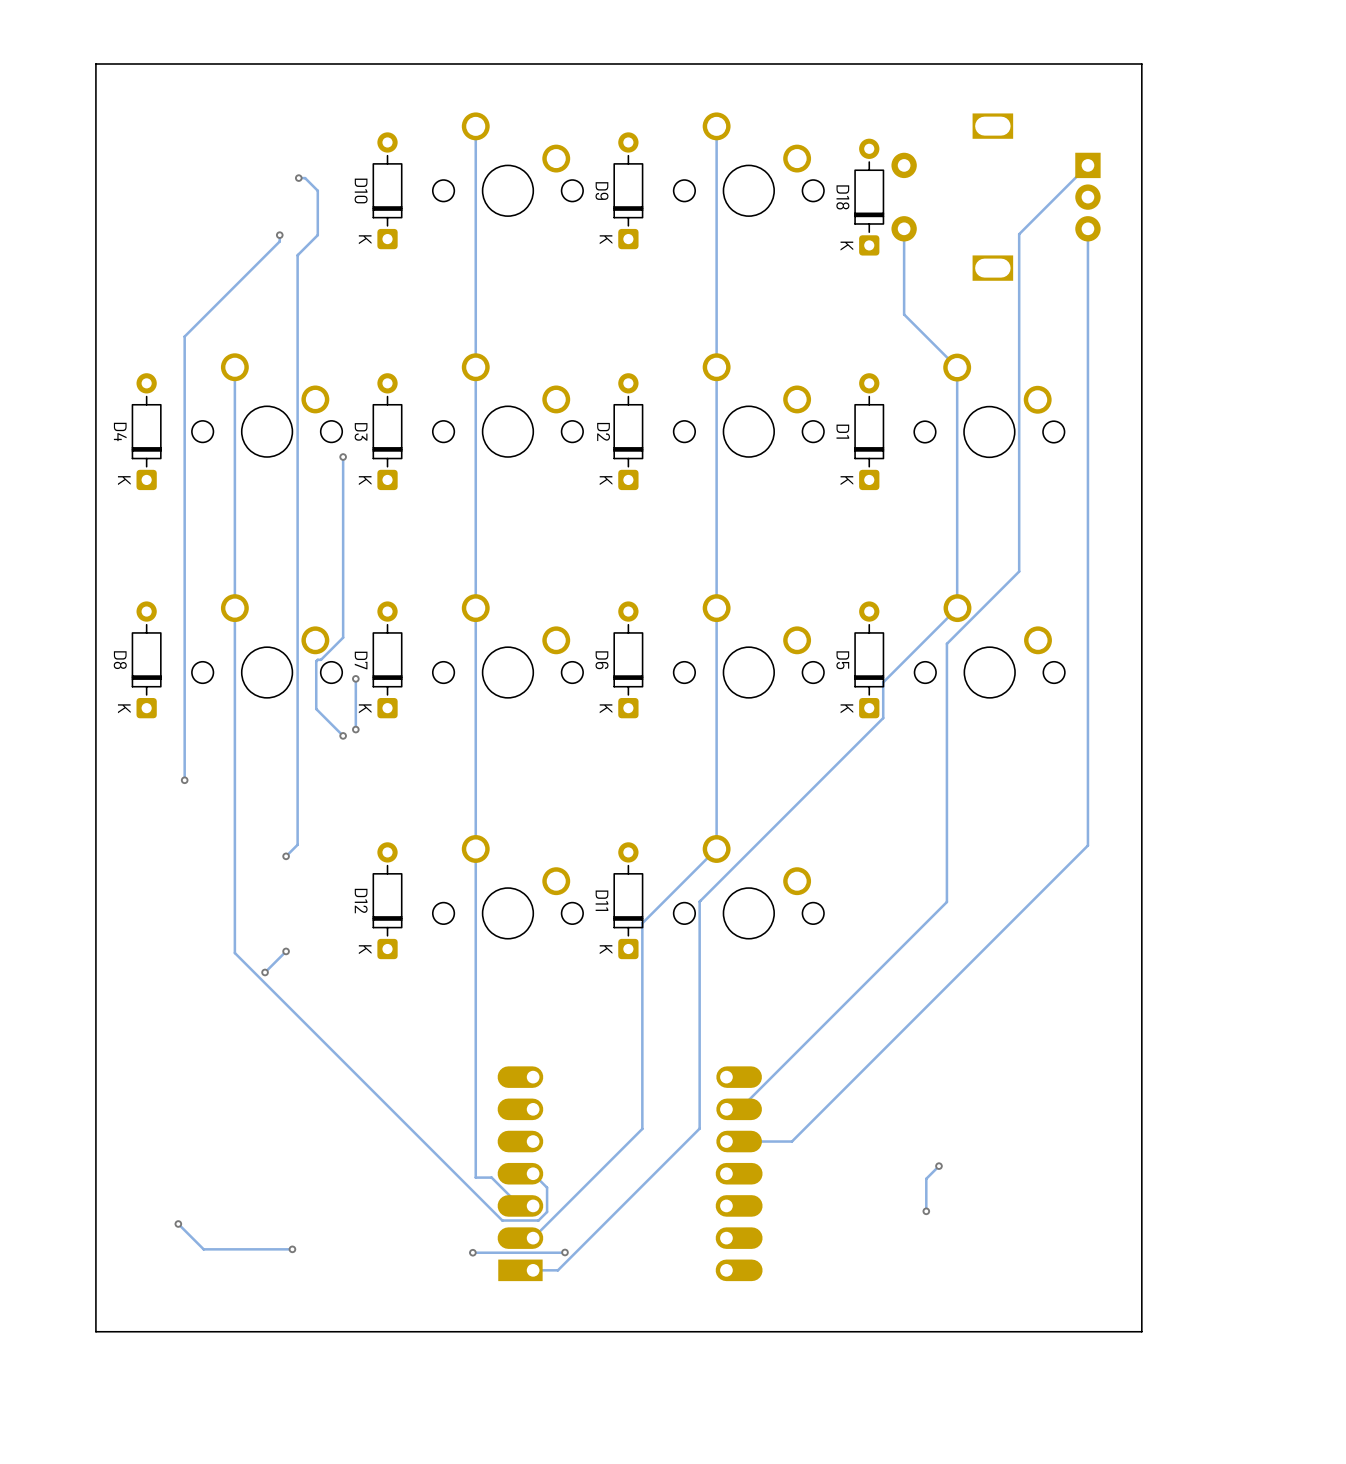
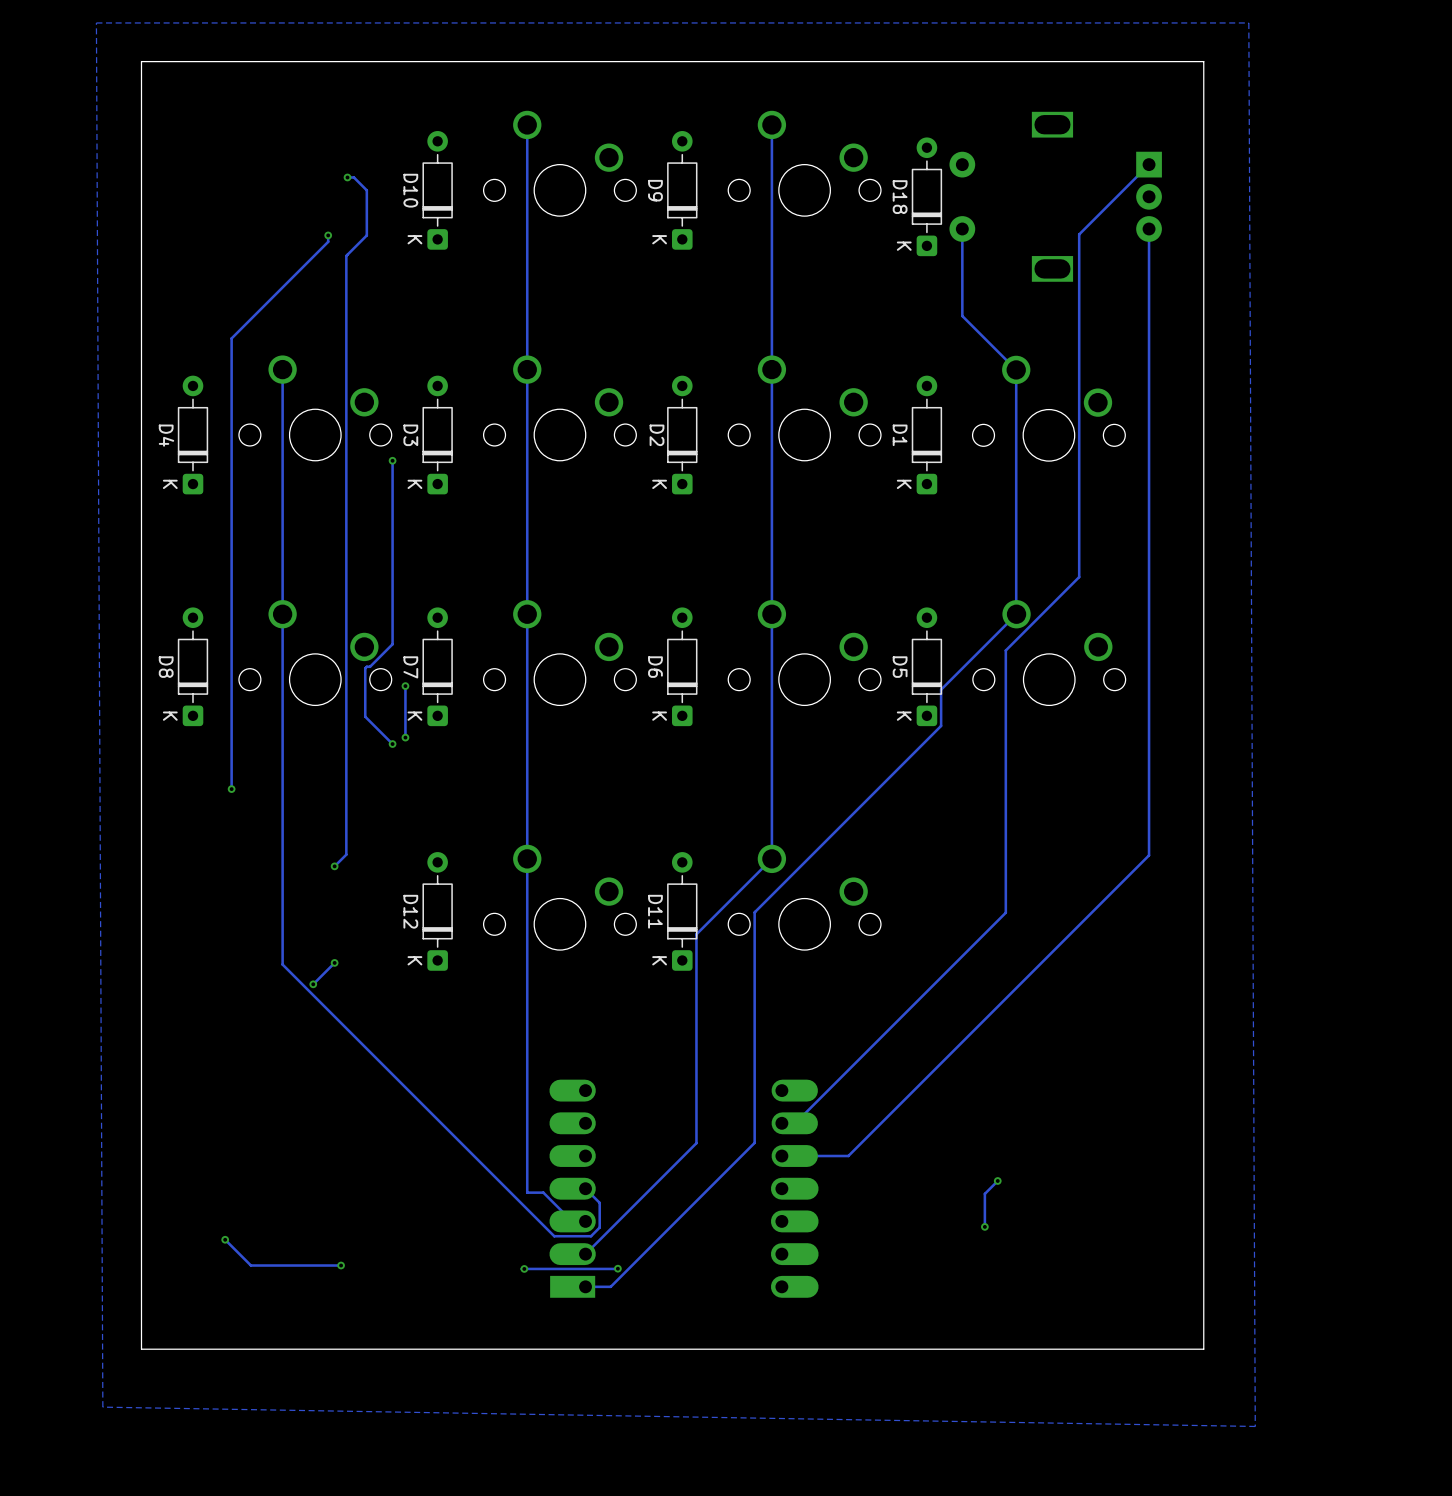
zone outline: none -> (1248, 22) (96, 22) (102, 1407) (1255, 1426) (1248, 22)

